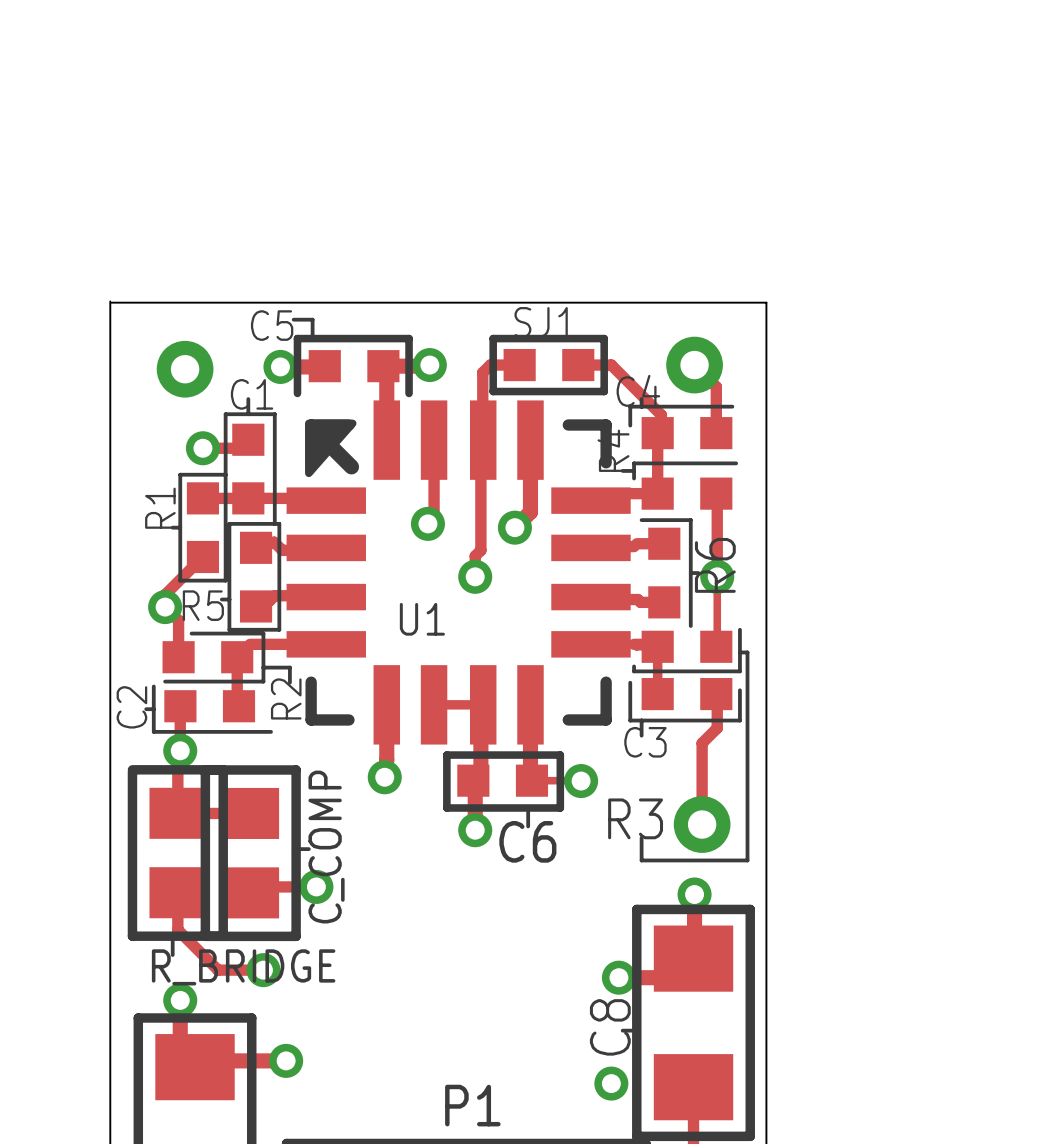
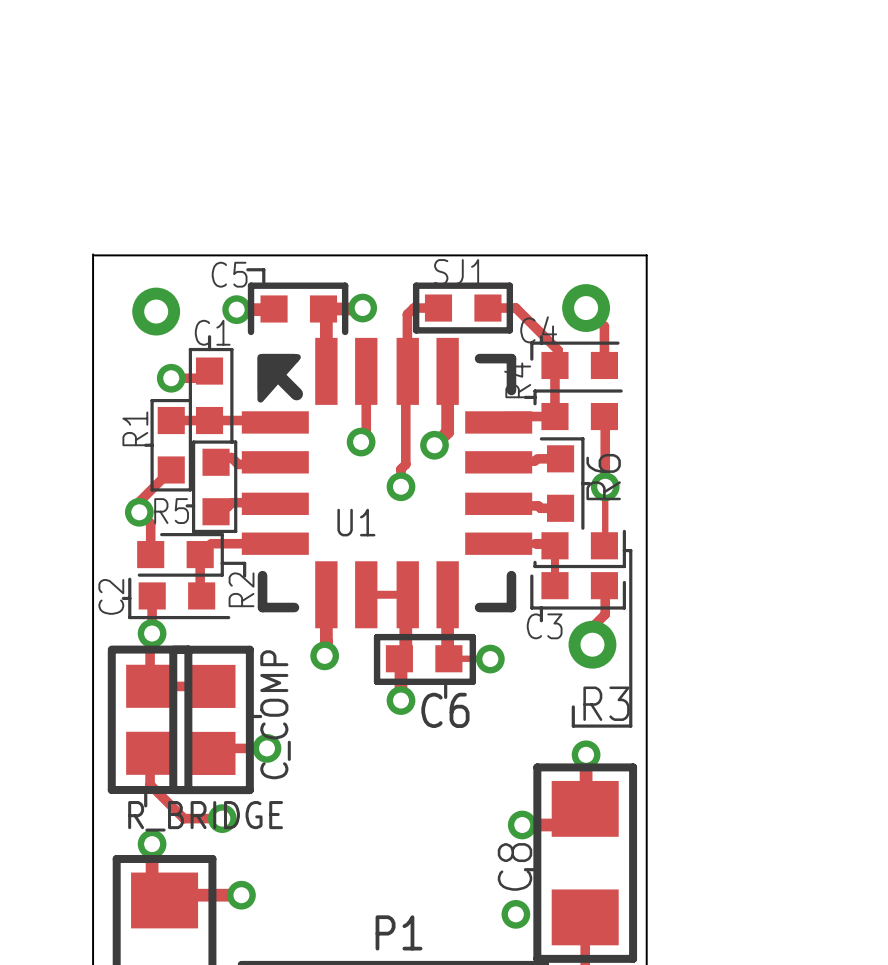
track: (702, 764) (702, 824) -> none
R3 name position: R3 (635, 818) -> R3 (606, 703)
part position: (702, 824) -> (592, 644)
line: (641, 837) (641, 860) (679, 860) -> (573, 706) (573, 726)

